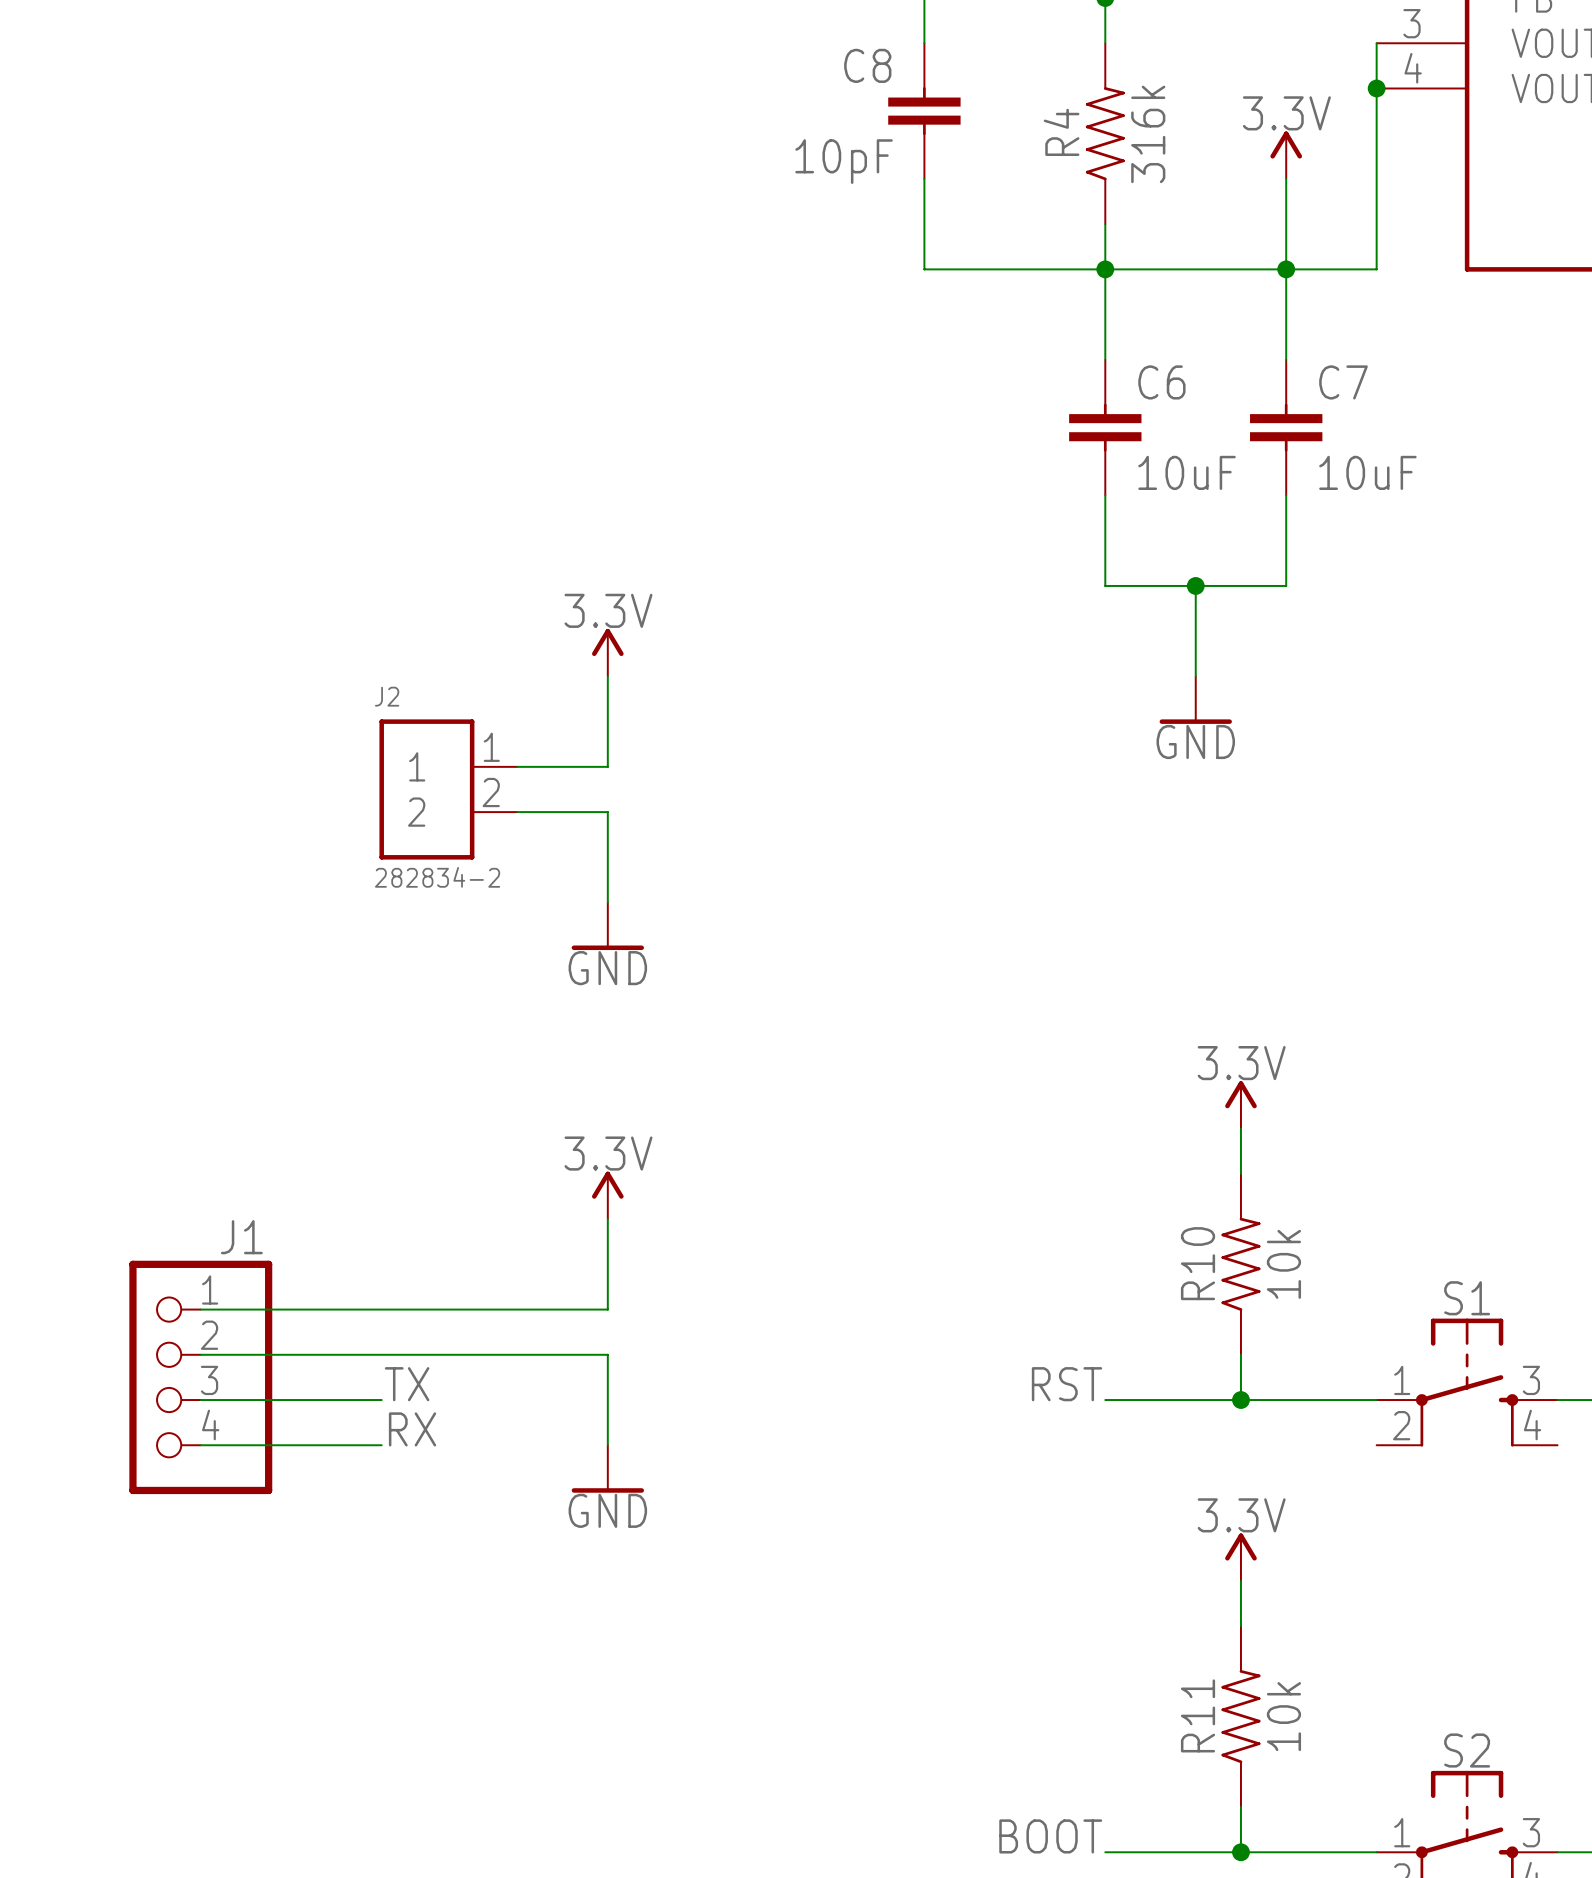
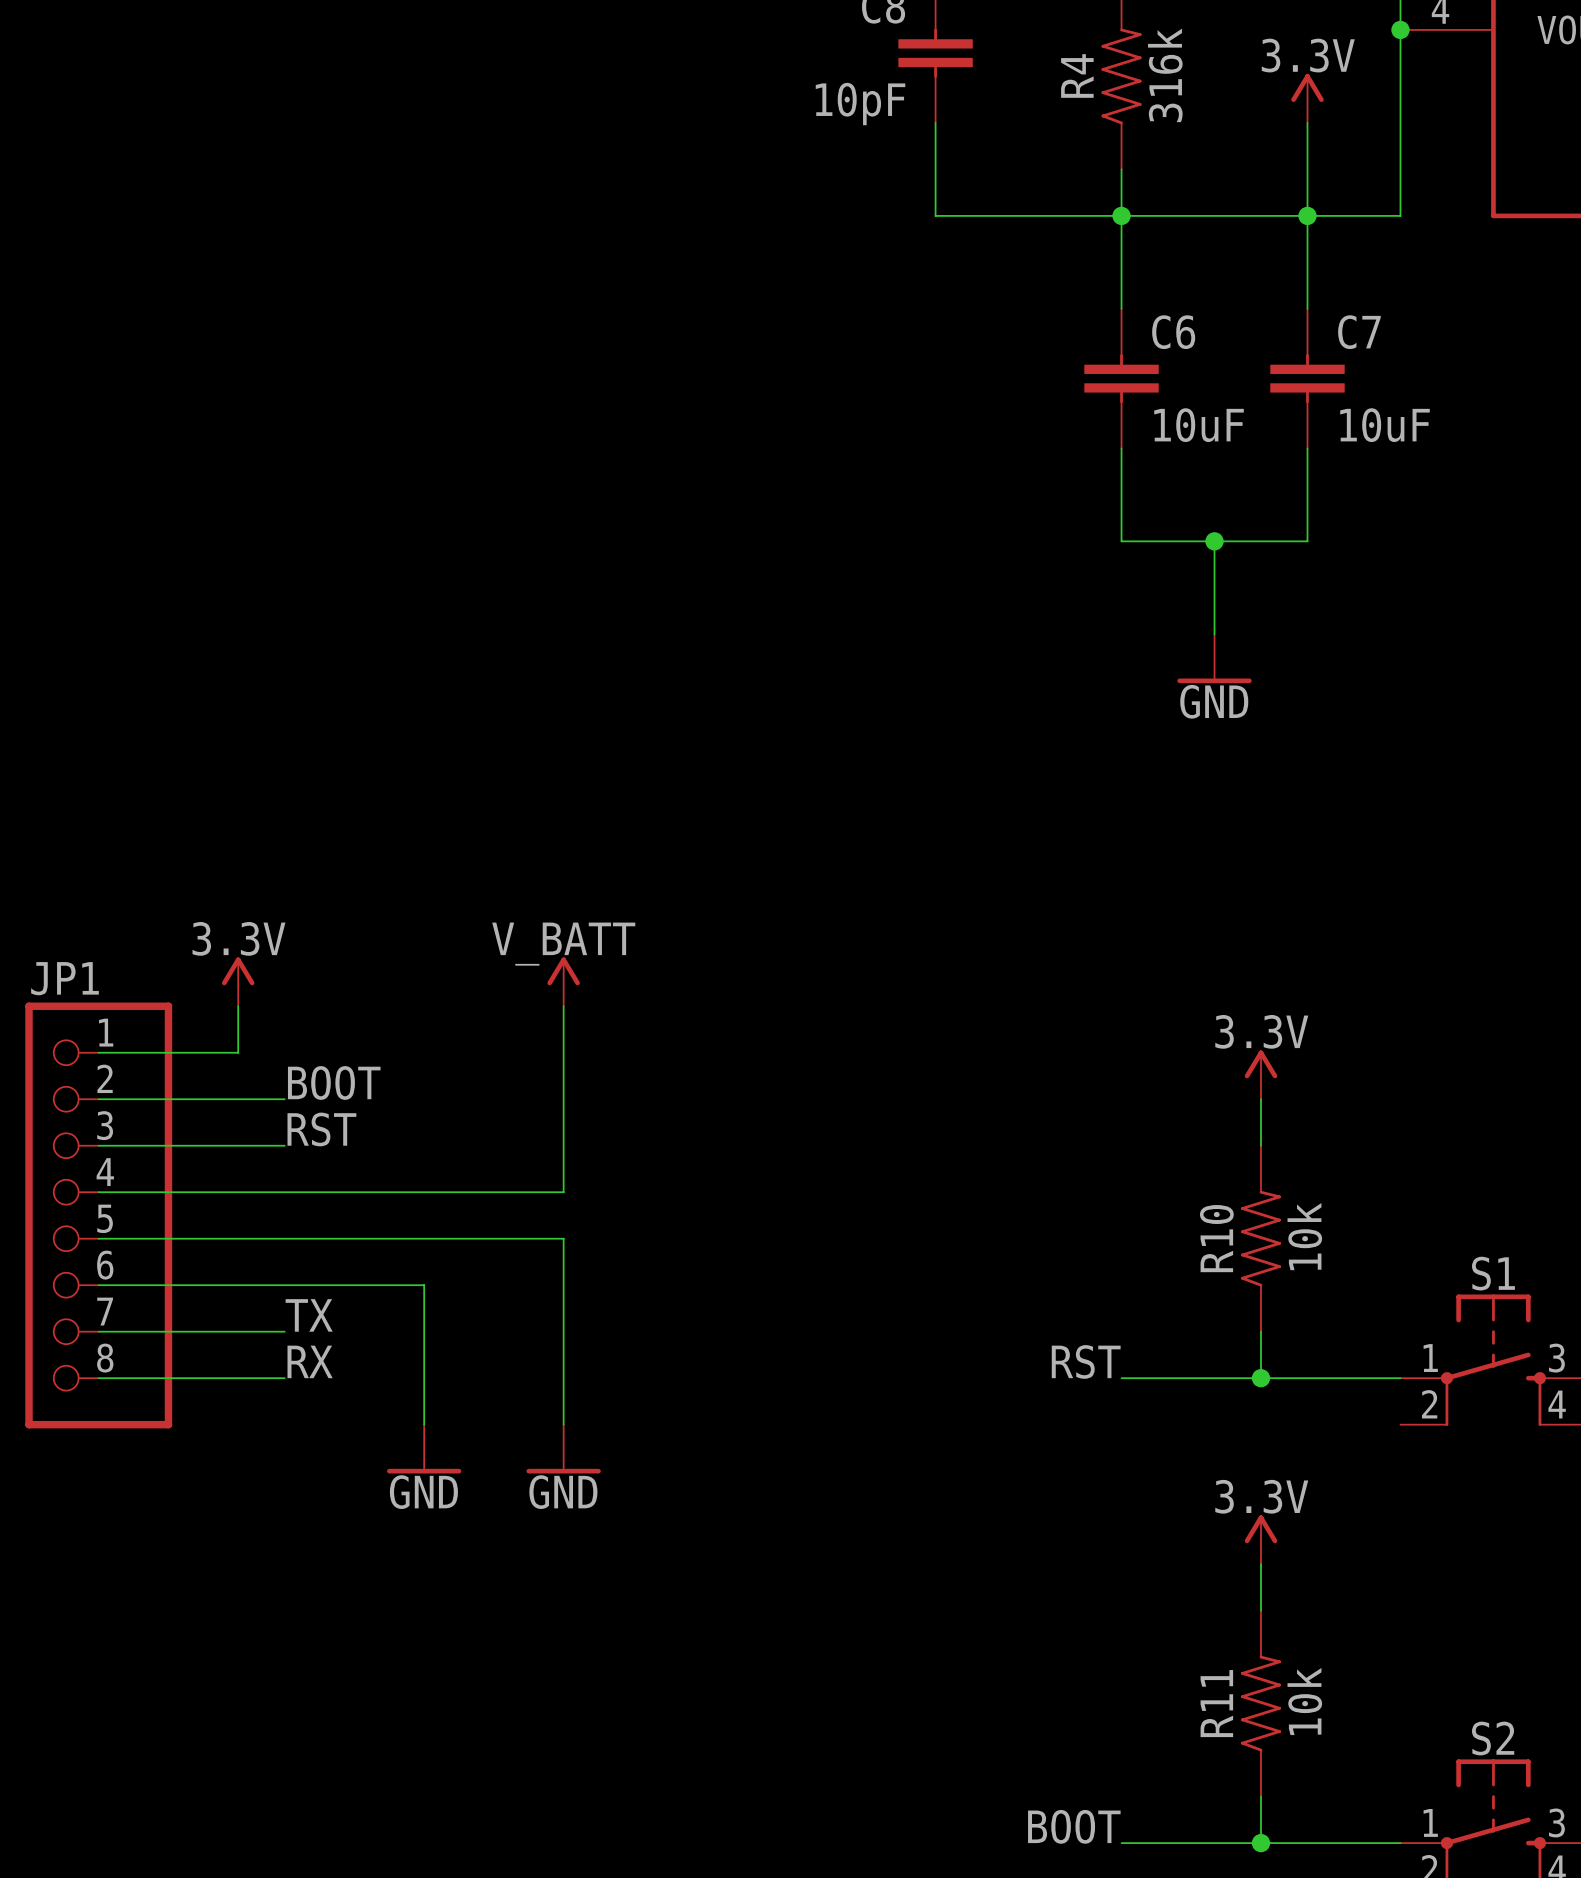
power symbol: 3.3V (607, 652) -> none
wire: (607, 676) (607, 766) (517, 766) -> none
J2: 282834-2 (448, 789) -> none
wire: (517, 812) (607, 812) (607, 902) -> none
power symbol: GND (607, 926) -> none
power symbol: none -> 3.3V (238, 981)
power symbol: none -> V_BATT (563, 981)
wire: none -> (238, 1006) (238, 1052) (98, 1052)
wire: none -> (563, 1006) (563, 1192) (98, 1192)
label: none -> BOOT (334, 1082)
wire: none -> (98, 1099) (284, 1099)
label: none -> RST (321, 1129)
power symbol: 3.3V (607, 1195) -> none
wire: (607, 1219) (607, 1309) (426, 1309) -> (424, 1424) (424, 1285)
JP1: none -> (98, 1215)
wire: none -> (98, 1238) (563, 1238) (563, 1424)
wire: none -> (98, 1285) (191, 1285)
wire: none -> (98, 1331) (191, 1331)
wire: (291, 1354) (607, 1354) (607, 1445) -> none
J1: (200, 1377) -> none
label position: TX (407, 1384) -> TX (309, 1315)
wire: (291, 1400) (381, 1400) -> (98, 1378) (191, 1378)
label position: RX (412, 1429) -> RX (310, 1361)
wire: (200, 1445) (381, 1445) -> (98, 1145) (284, 1145)
power symbol: none -> GND (424, 1449)
power symbol position: GND (607, 1468) -> GND (563, 1449)

